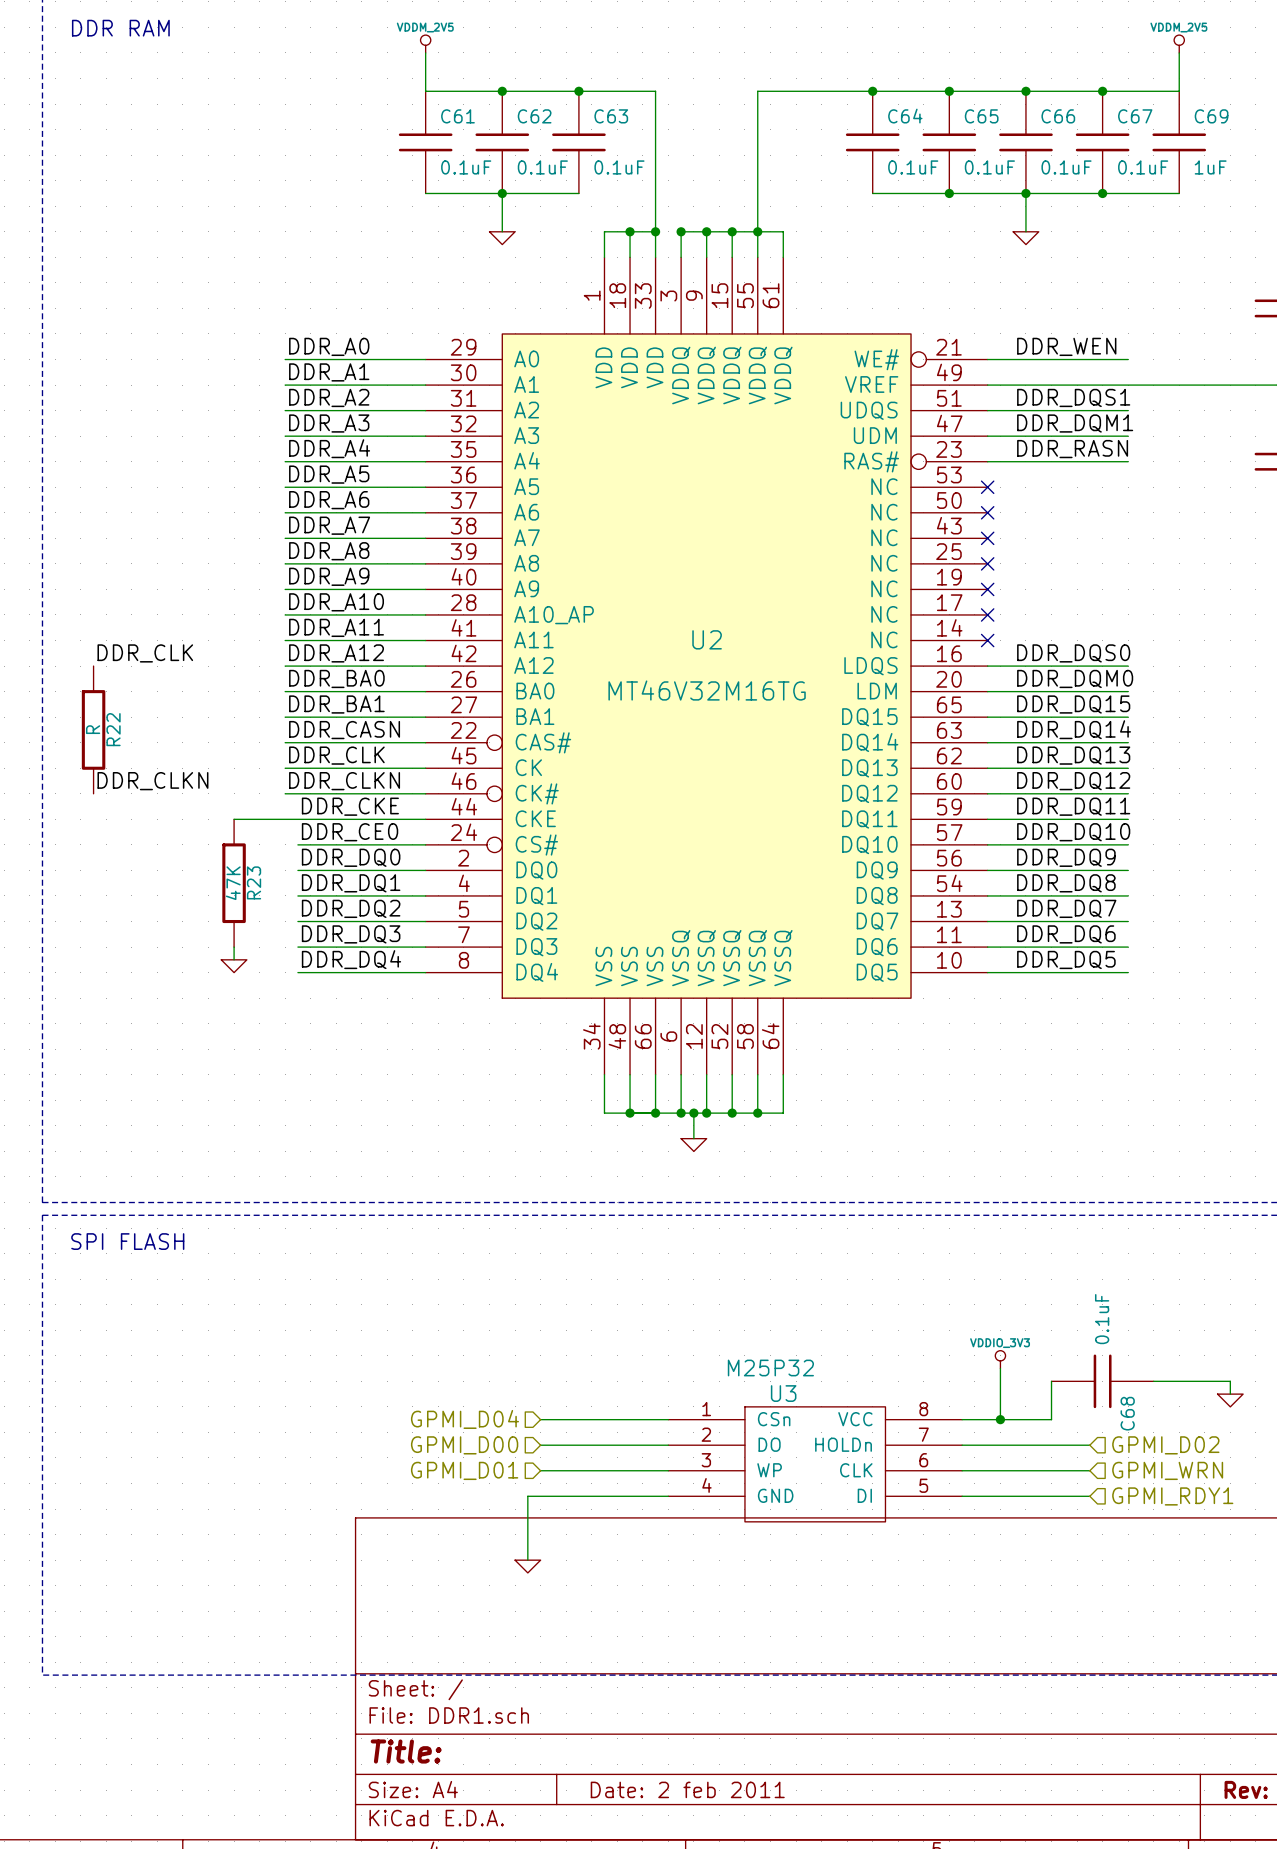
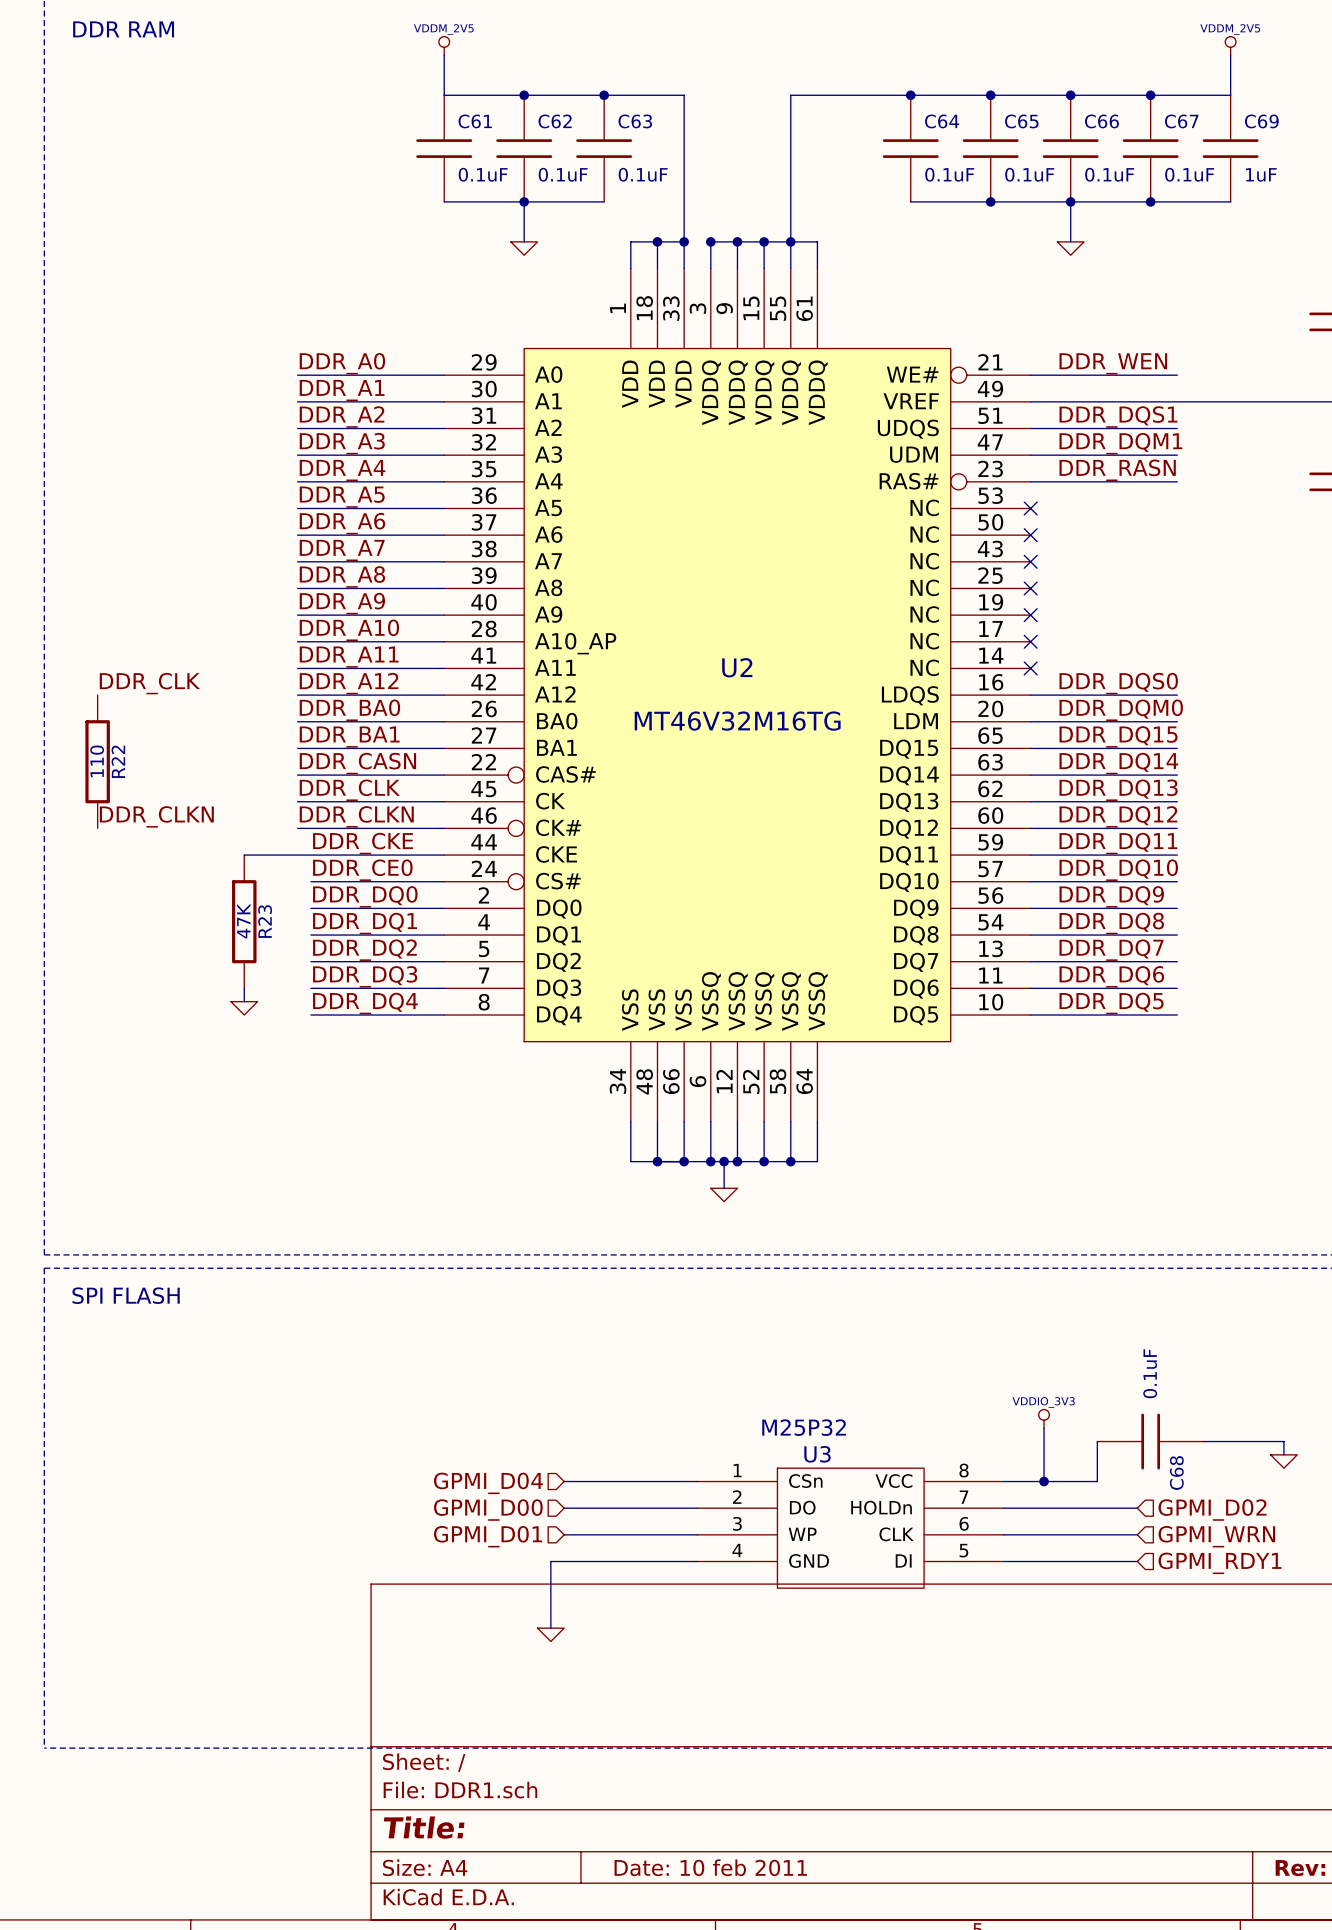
R22 value: R (93, 729) -> 110 (97, 761)
title block: Date: 2 feb 2011 (687, 1789) -> Date: 10 feb 2011 (710, 1867)

